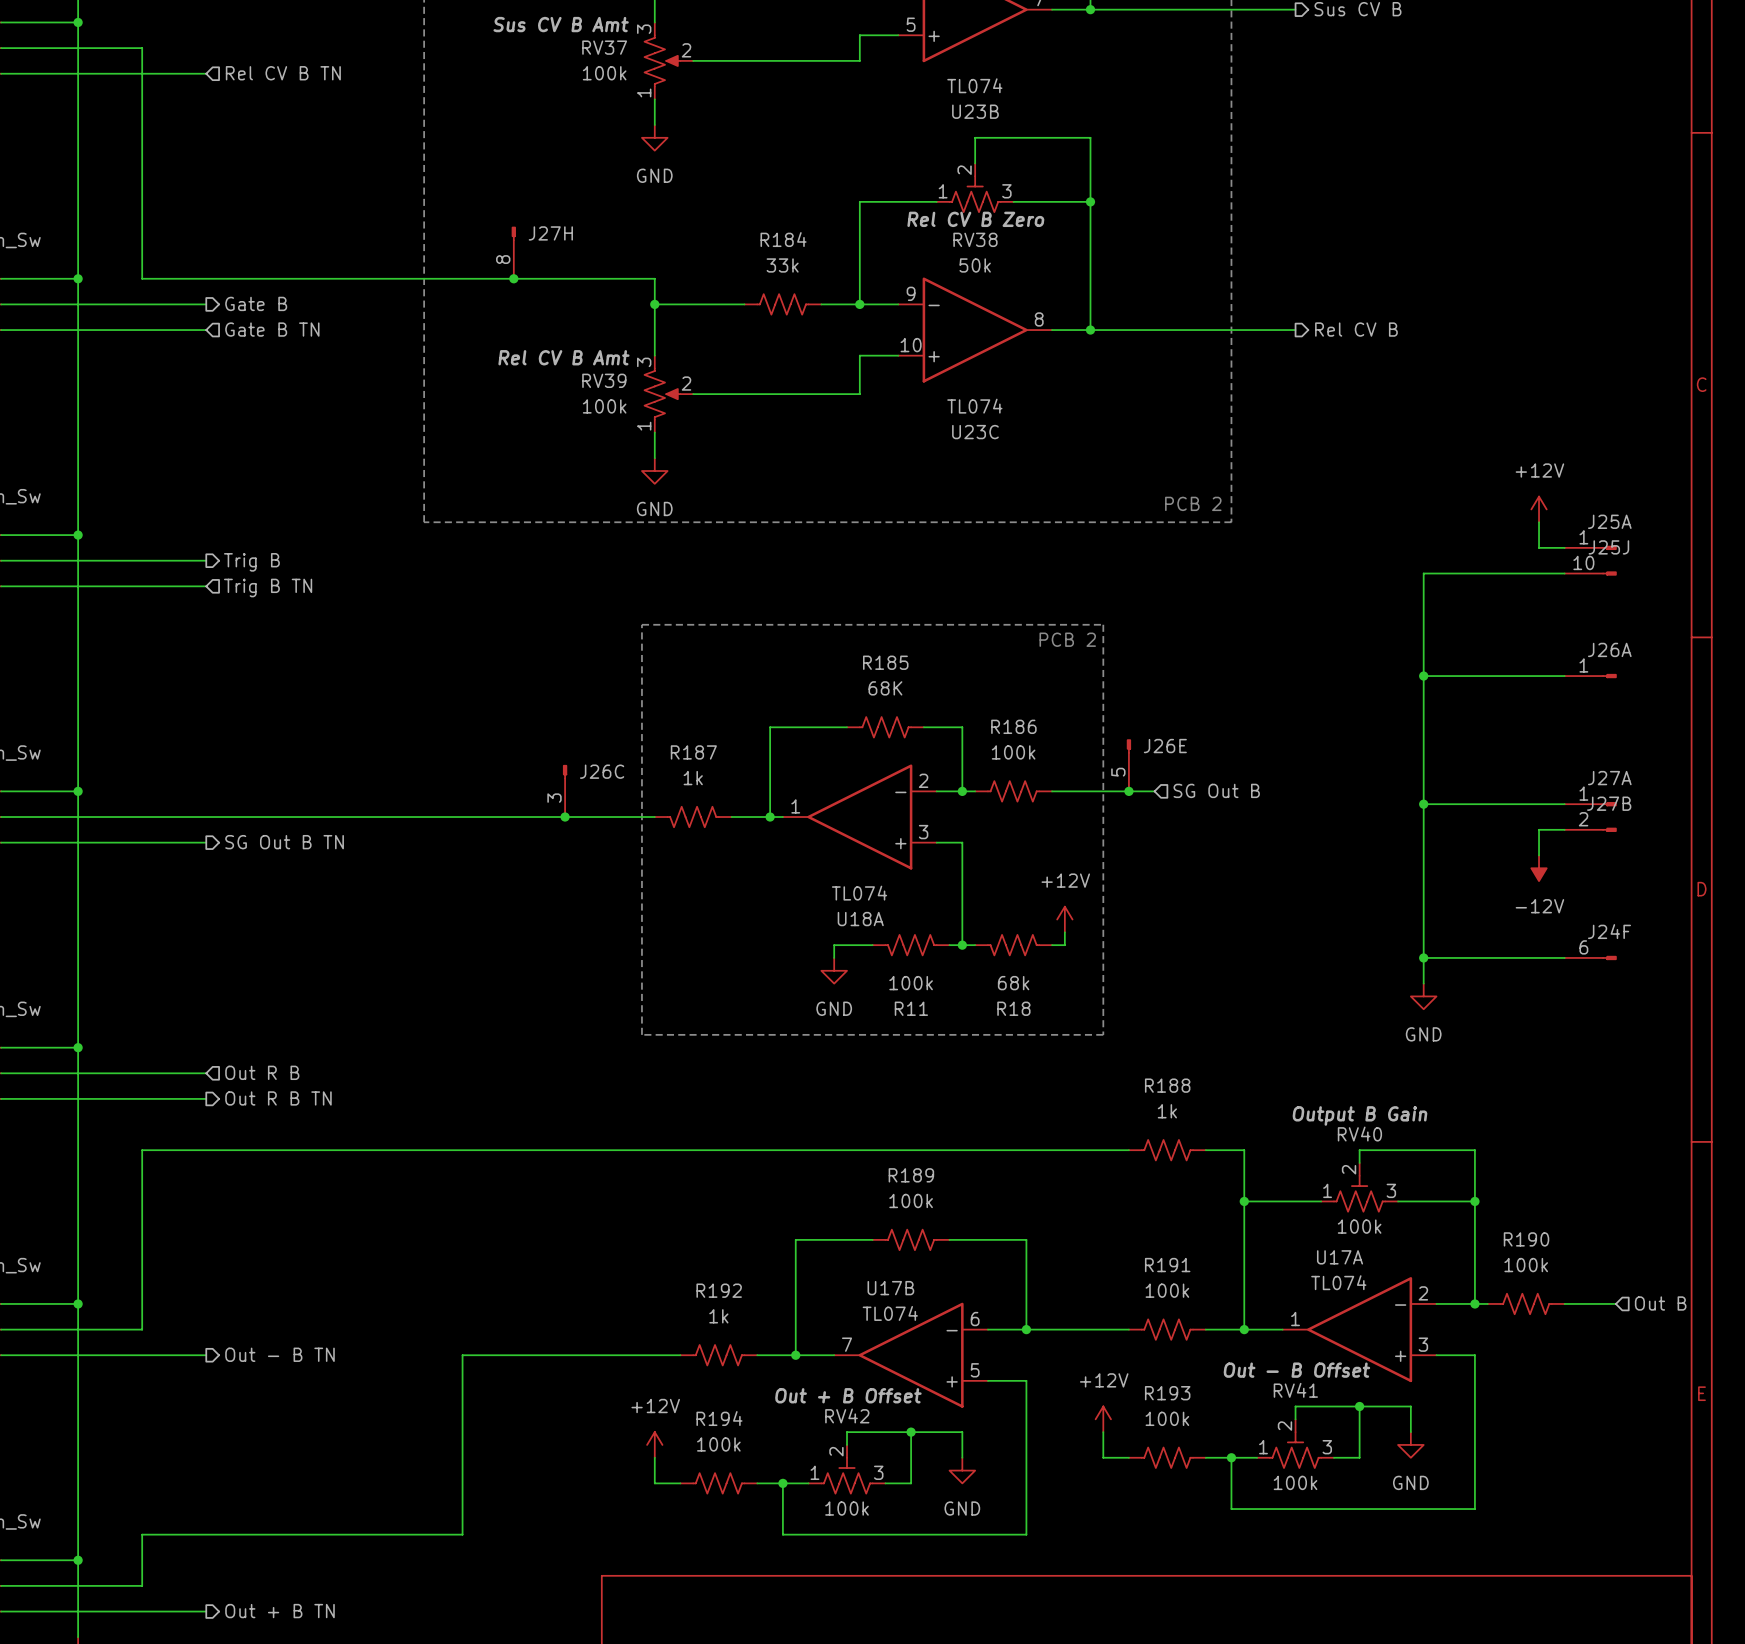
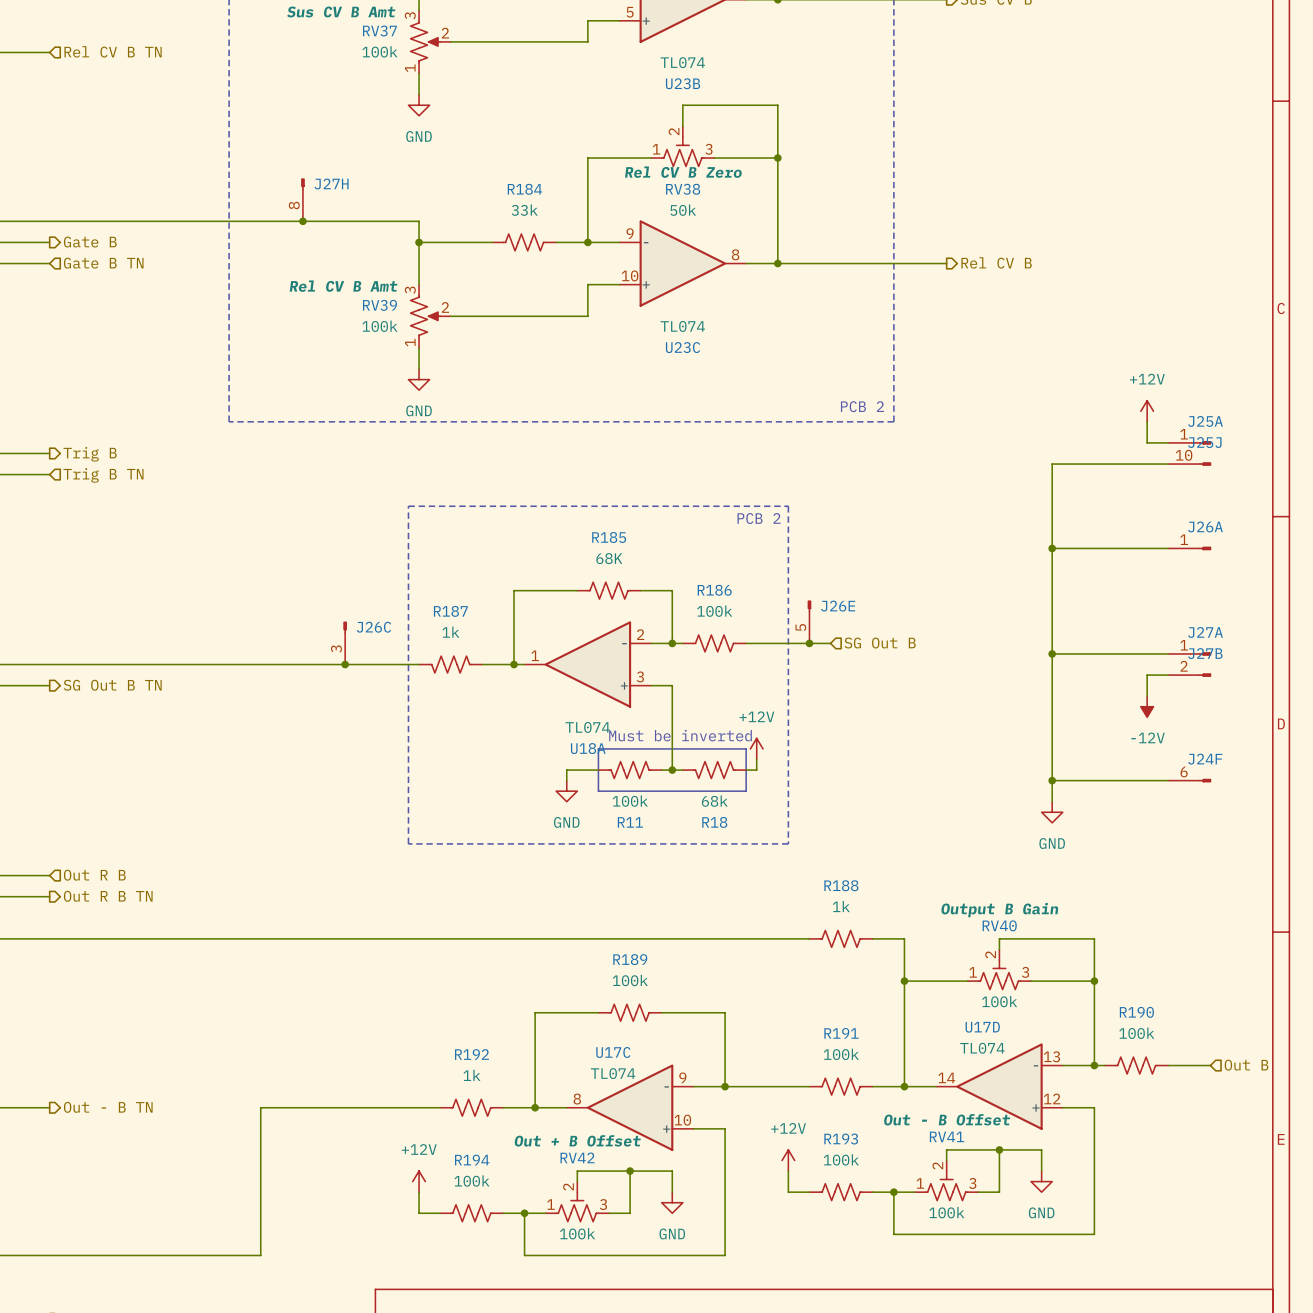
text: none -> Must be inverted (680, 735)
line: none -> (598, 748) (746, 748) (746, 791) (598, 791) (598, 748)
U17A name: U17A (1340, 1257) -> U17D (982, 1027)
U17B name: U17B (890, 1288) -> U17C (613, 1052)
U17A pin number: 2 (1423, 1293) -> 13 (1051, 1056)
U17B pin number: 6 (975, 1319) -> 9 (682, 1077)
U17A pin number: 1 (1295, 1319) -> 14 (946, 1077)
U17B pin number: 7 (847, 1344) -> 8 (577, 1099)
U17A pin number: 3 (1423, 1344) -> 12 (1052, 1098)
U17B pin number: 5 (975, 1370) -> 10 (682, 1120)

